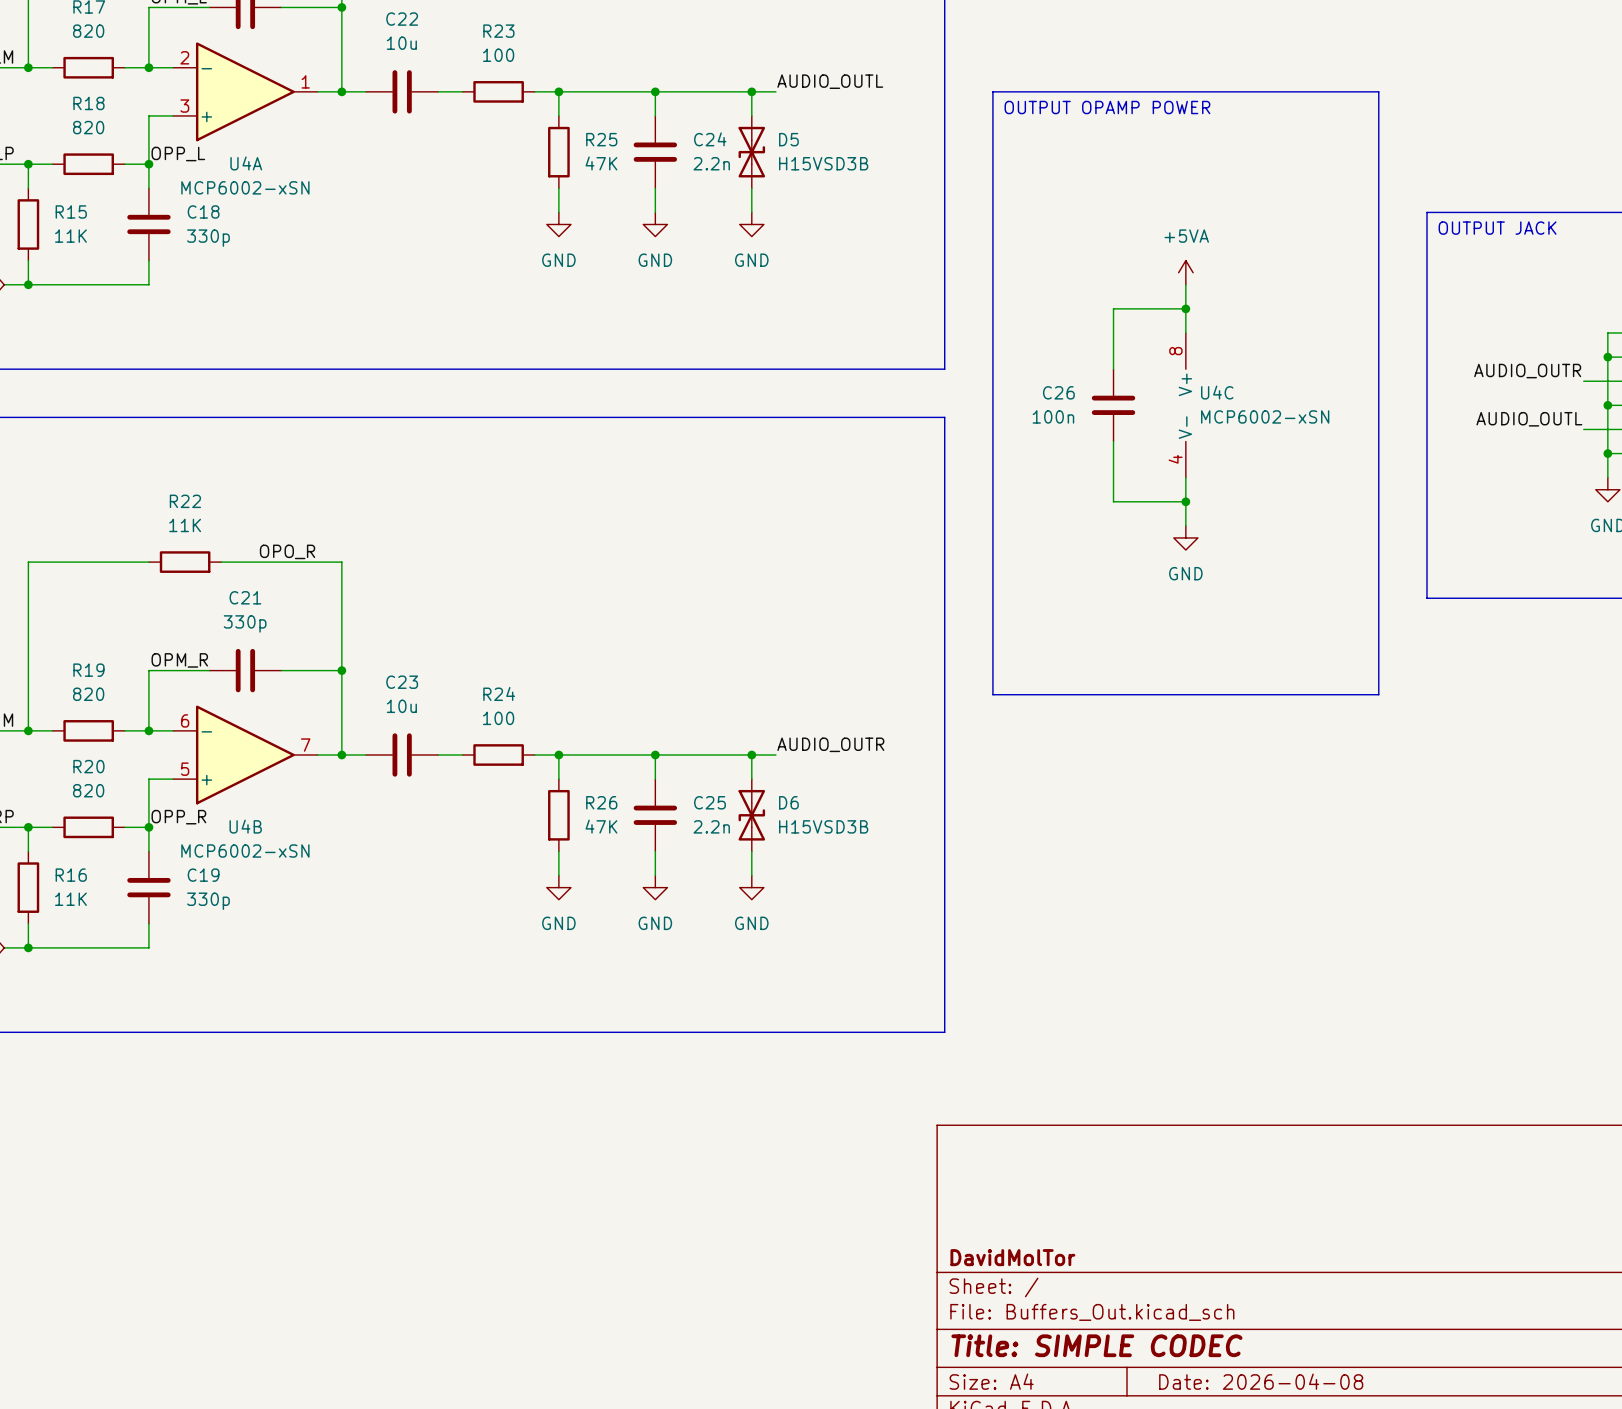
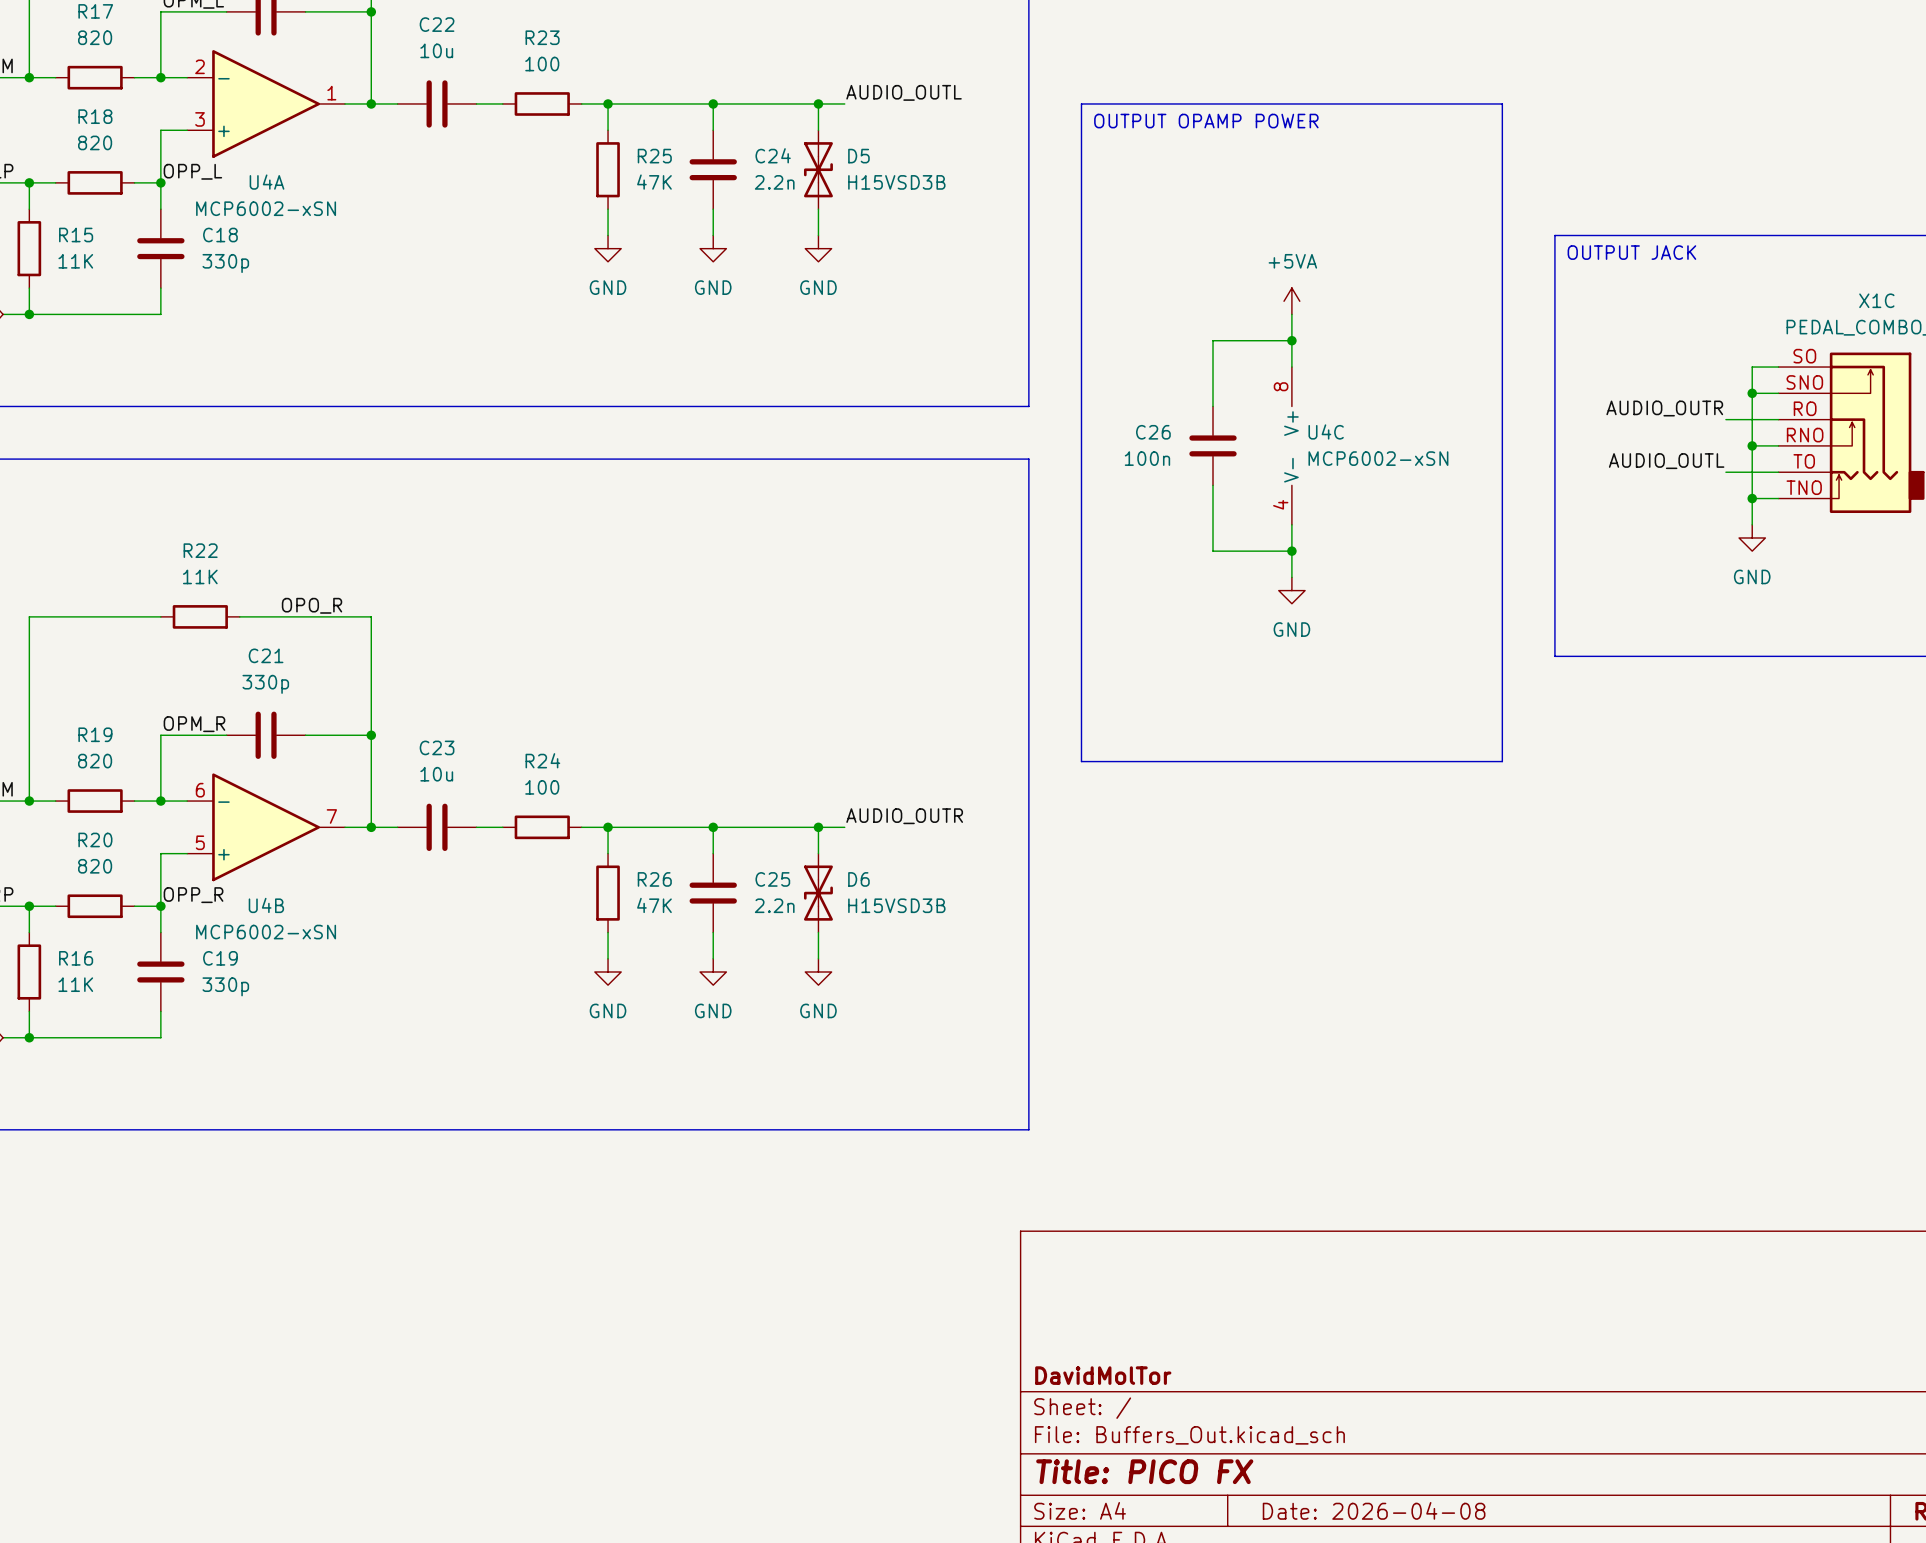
title block: Title: SIMPLE CODEC (1096, 1345) -> Title: PICO FX (1144, 1471)

